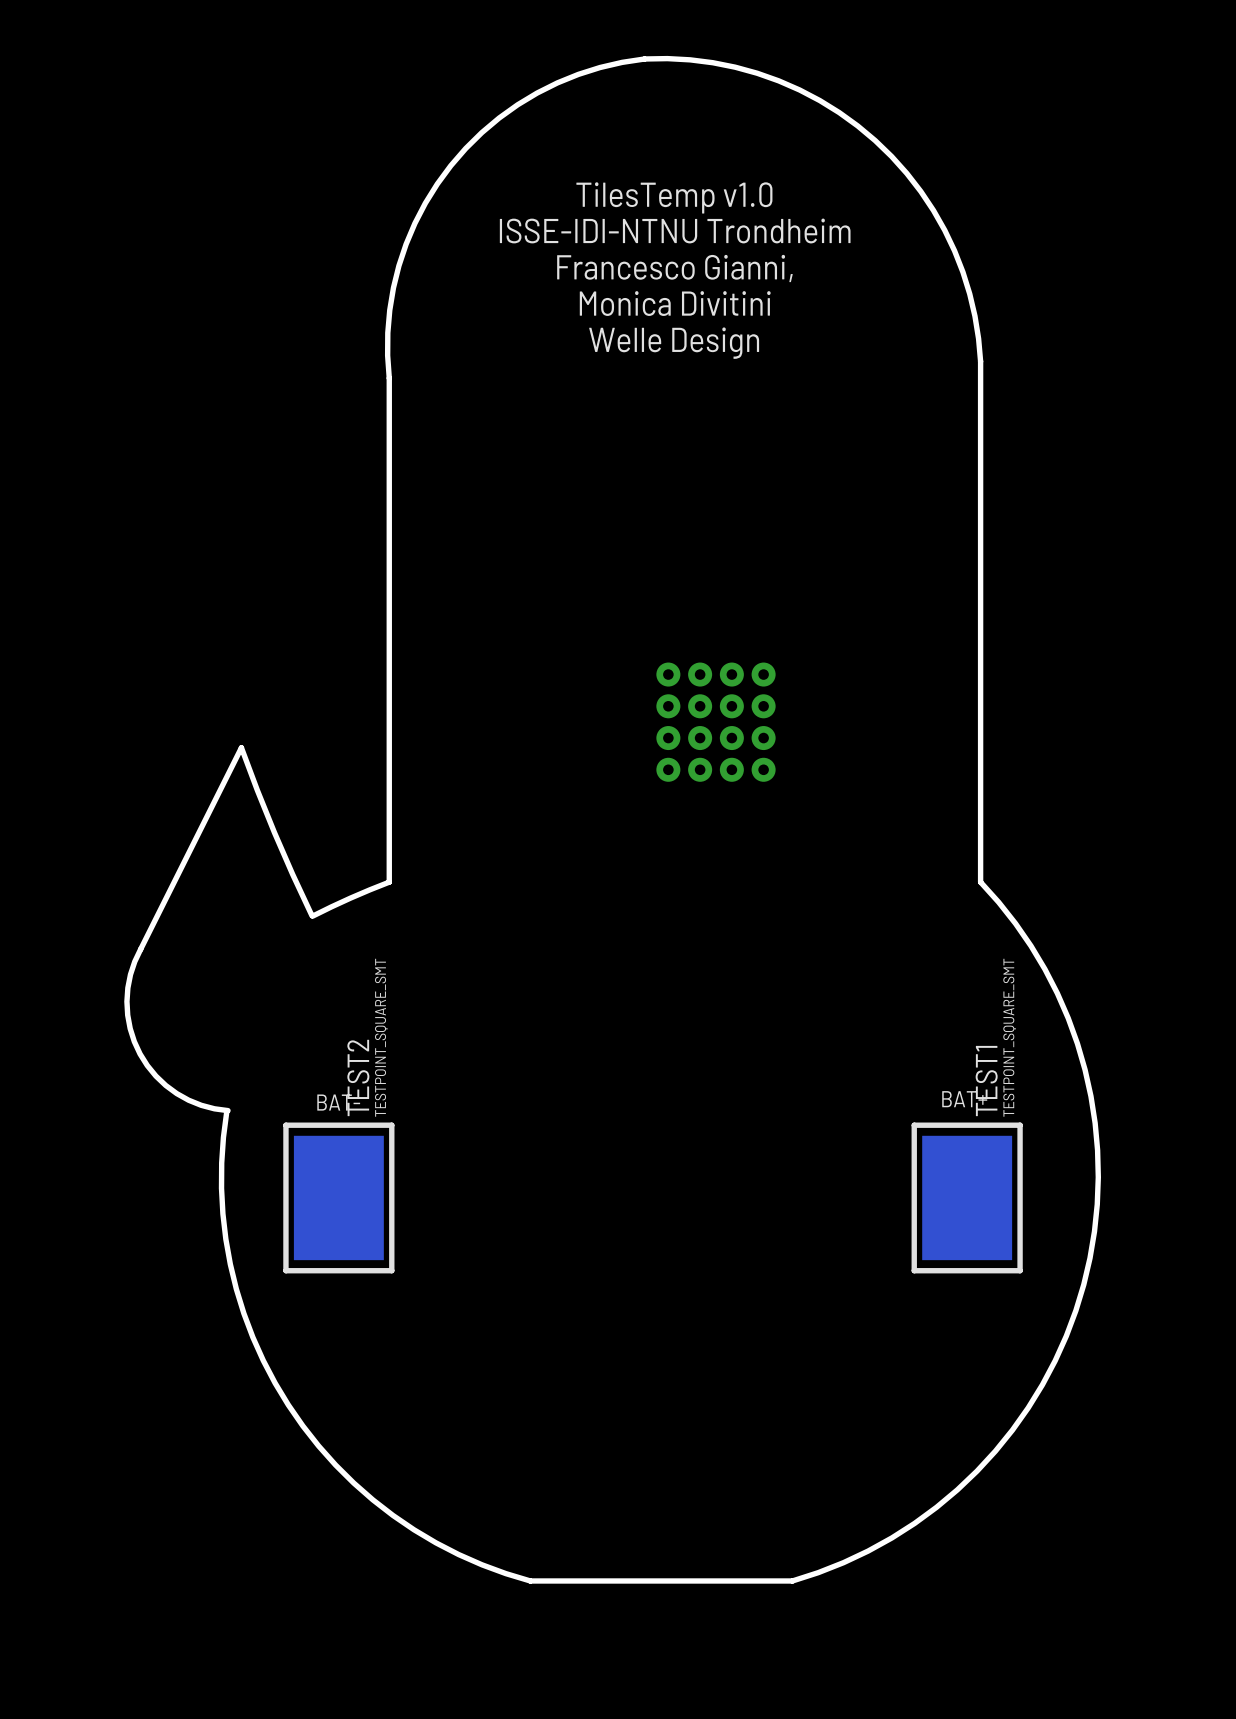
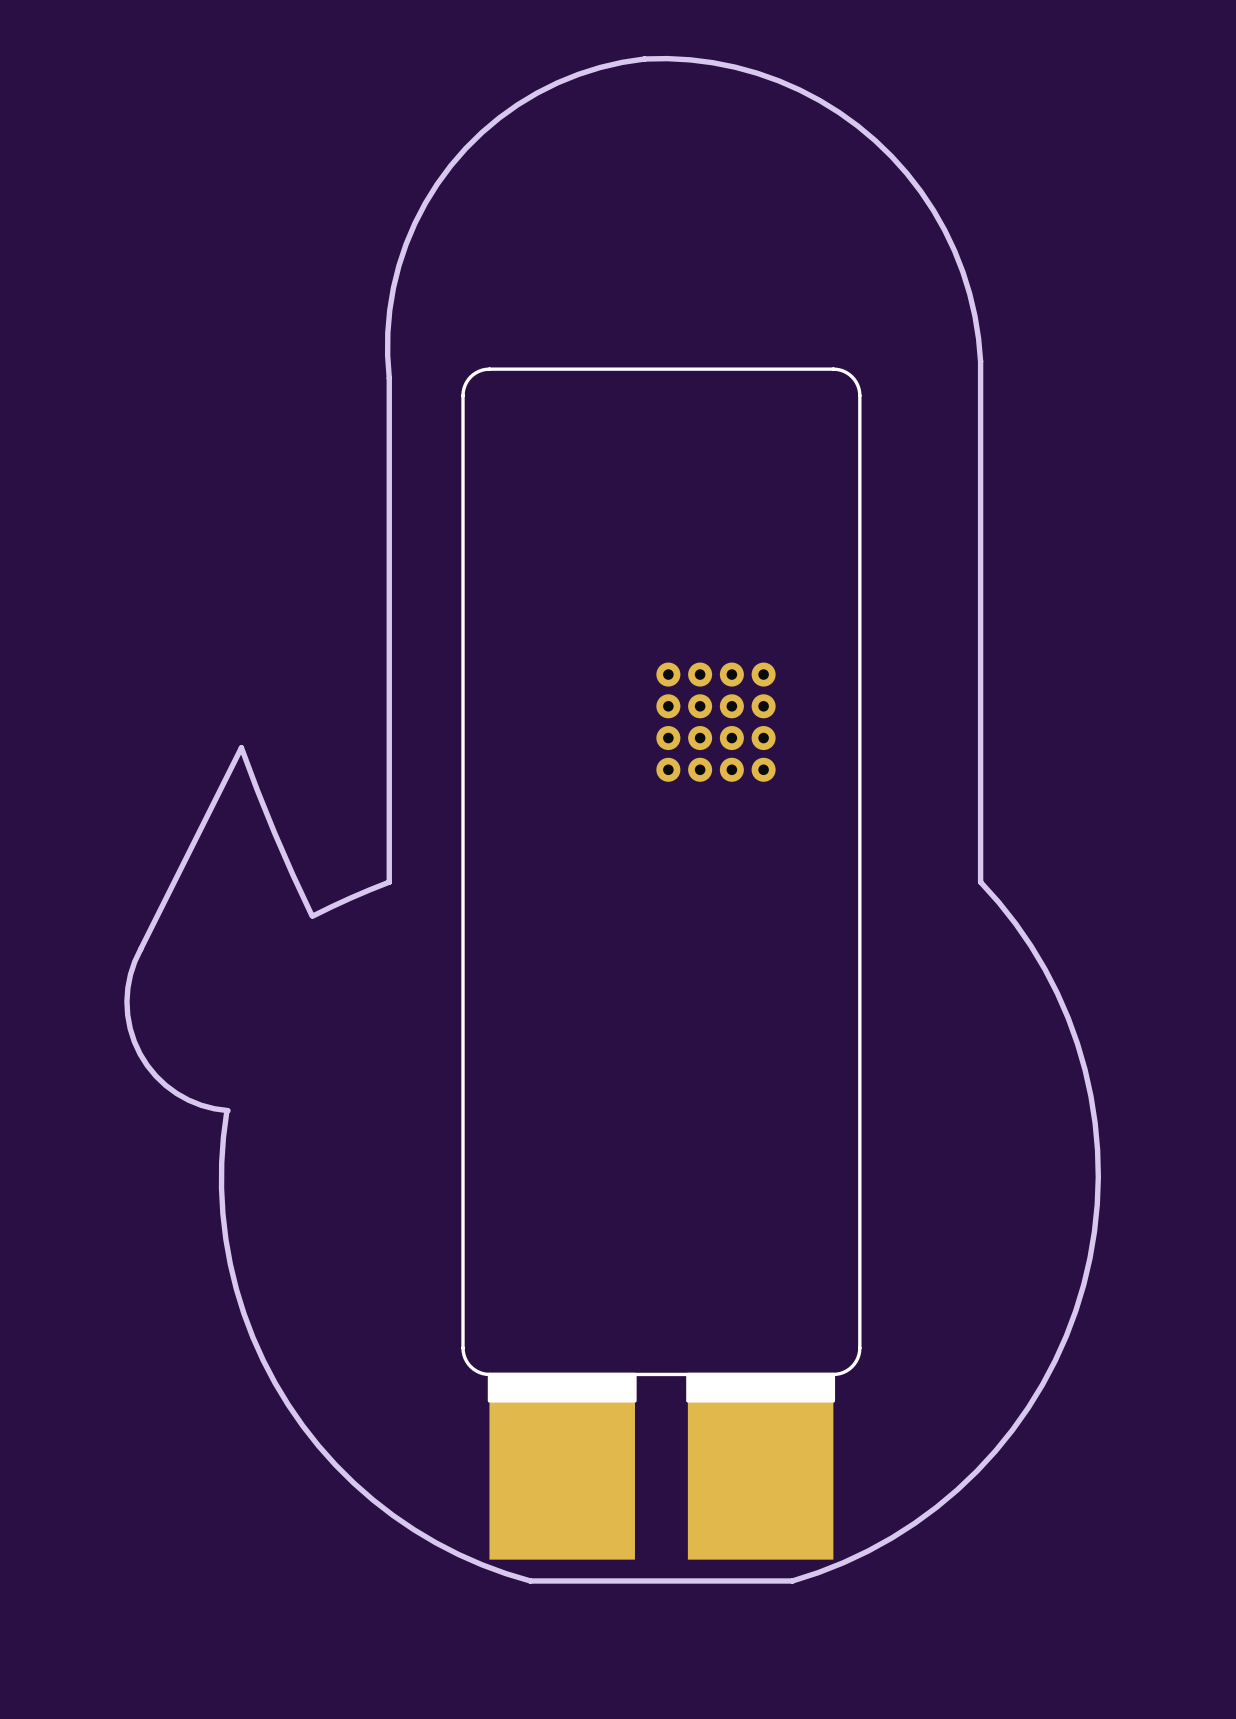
text: TilesTemp v1.0 (674, 197) -> none
text: ISSE-IDI-NTNU Trondheim (675, 230) -> none
text: Francesco Gianni, (674, 268) -> none
text: Monica Divitini (675, 303) -> none
text: Welle Design (674, 343) -> none
part: none -> (661, 963)
text: BAT+ (964, 1099) -> none
text: BAT- (338, 1102) -> none
TEST2: TESTPOINT_SQUARE_SMT (338, 1197) -> none
TEST1: TESTPOINT_SQUARE_SMT (967, 1197) -> none

